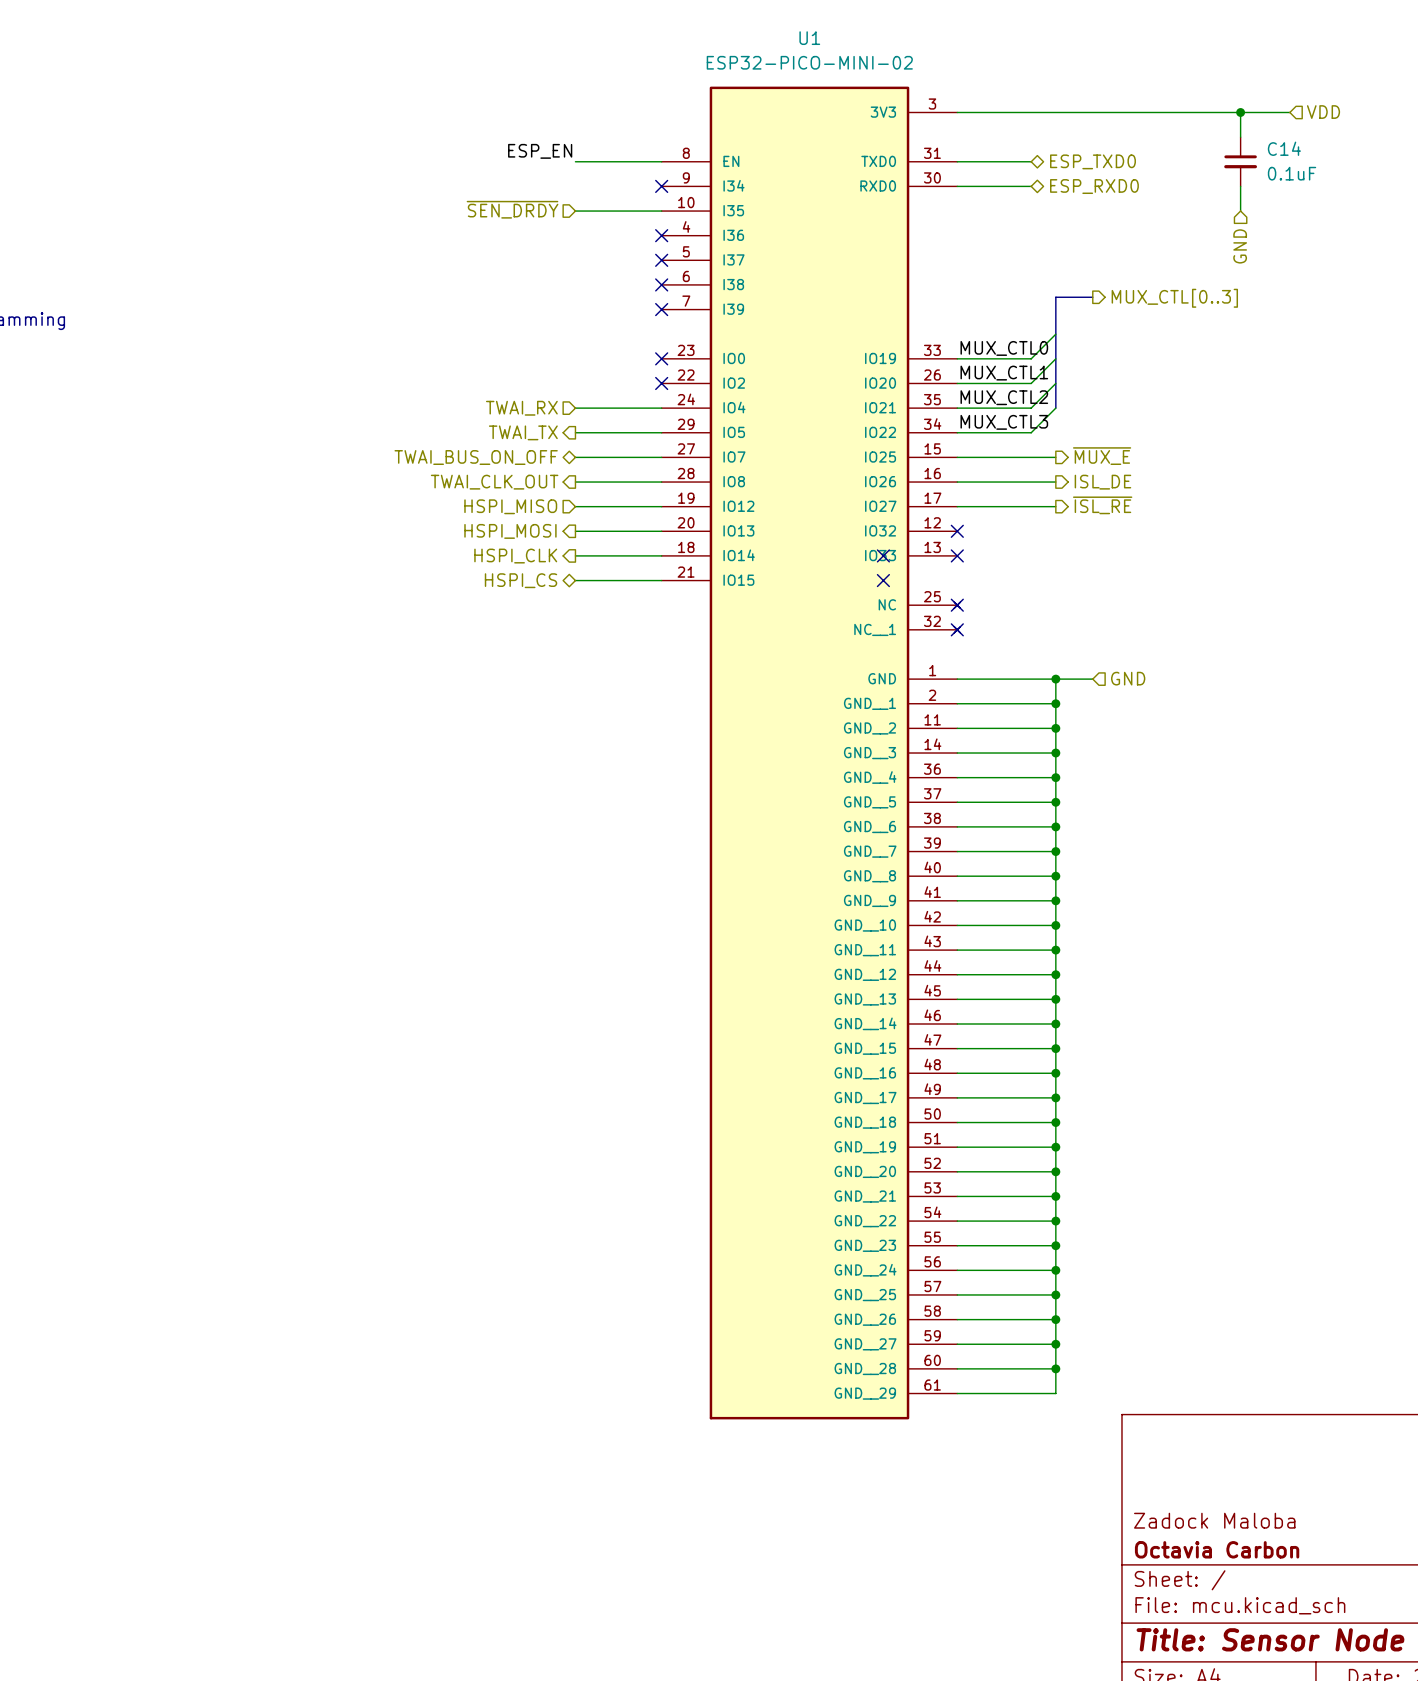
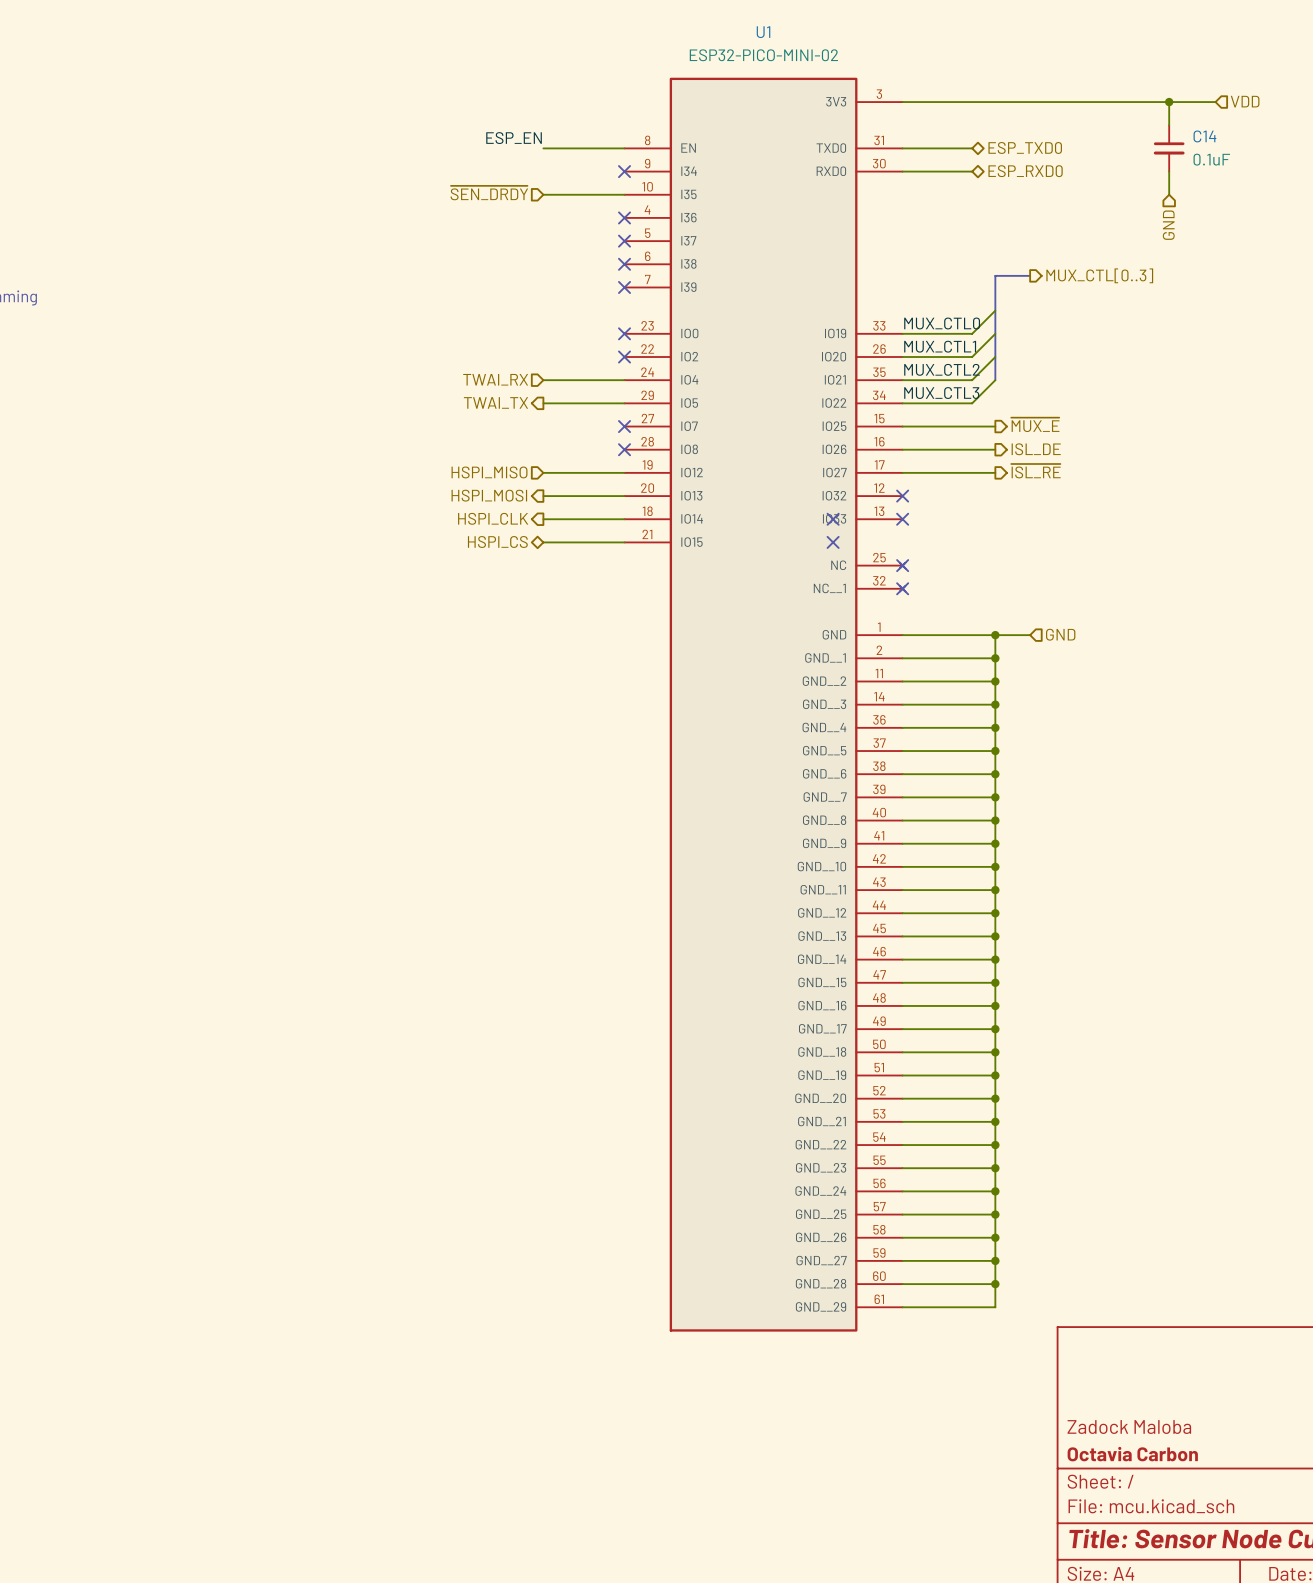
hierarchical label: TWAI_BUS_ON_OFF (476, 457) -> none
wire: (575, 457) (661, 457) -> none
no-connect mark: none -> (624, 426)
hierarchical label: TWAI_CLK_OUT (494, 482) -> none
wire: (575, 482) (661, 482) -> none
no-connect mark: none -> (624, 449)

